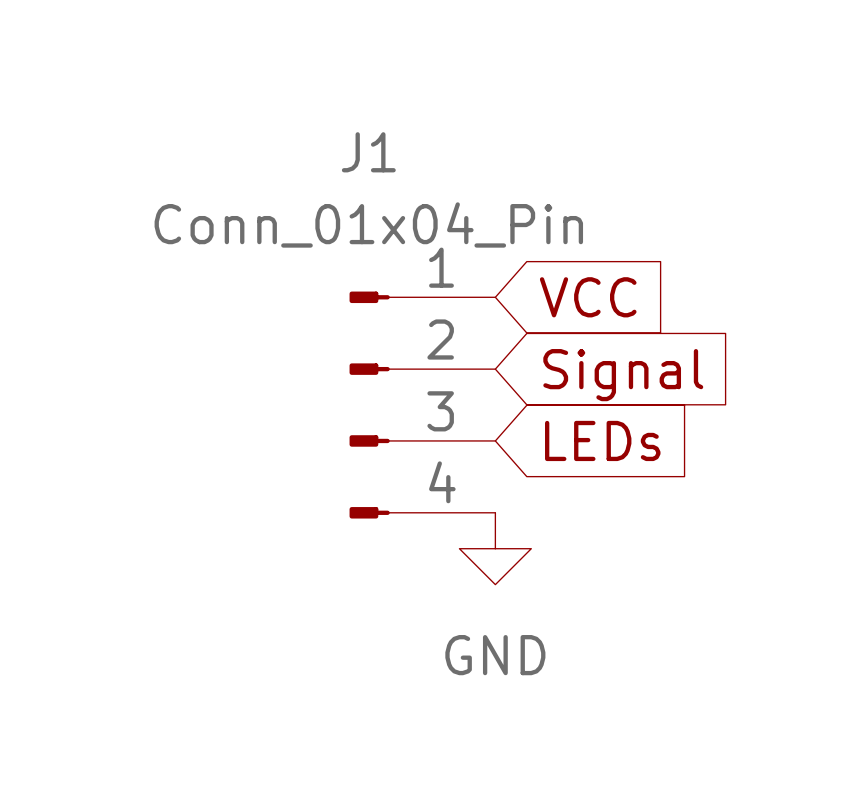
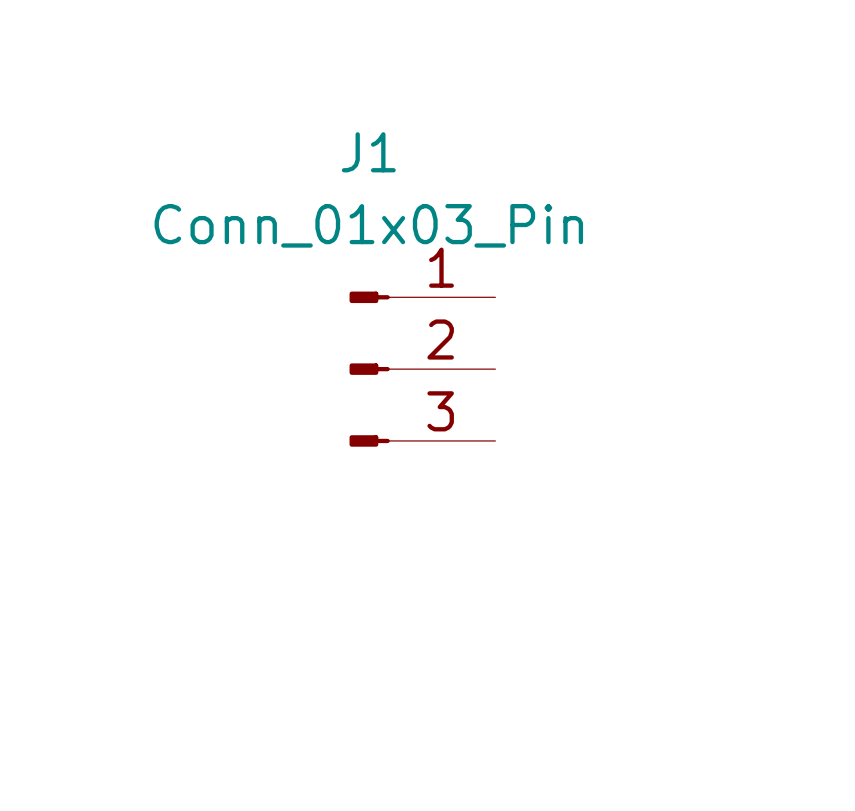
J1 value: Conn_01x04_Pin (368, 224) -> Conn_01x03_Pin (368, 225)
J1 symbol: [349, 291, 496, 519] -> [349, 291, 496, 447]
global label: VCC (588, 297) -> none
global label: Signal (623, 375) -> none
global label: LEDs (602, 440) -> none
power symbol: GND (495, 548) -> none

